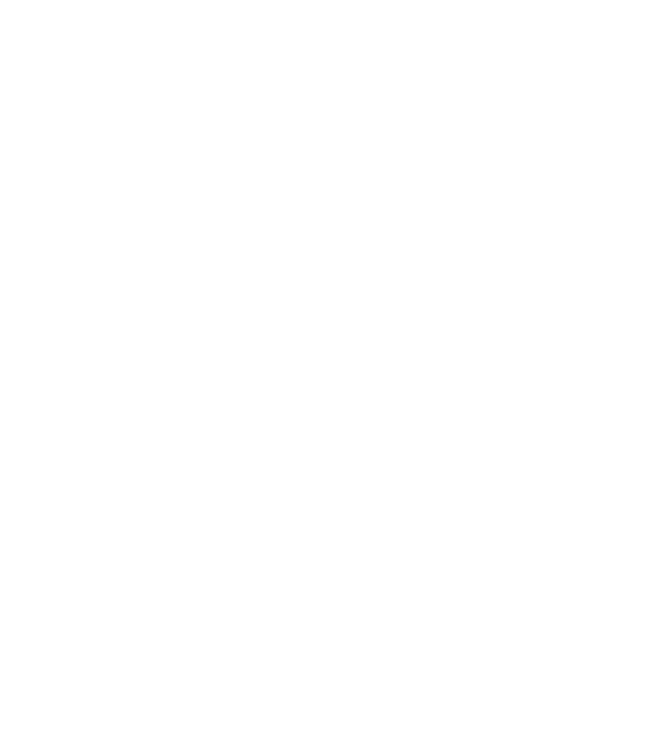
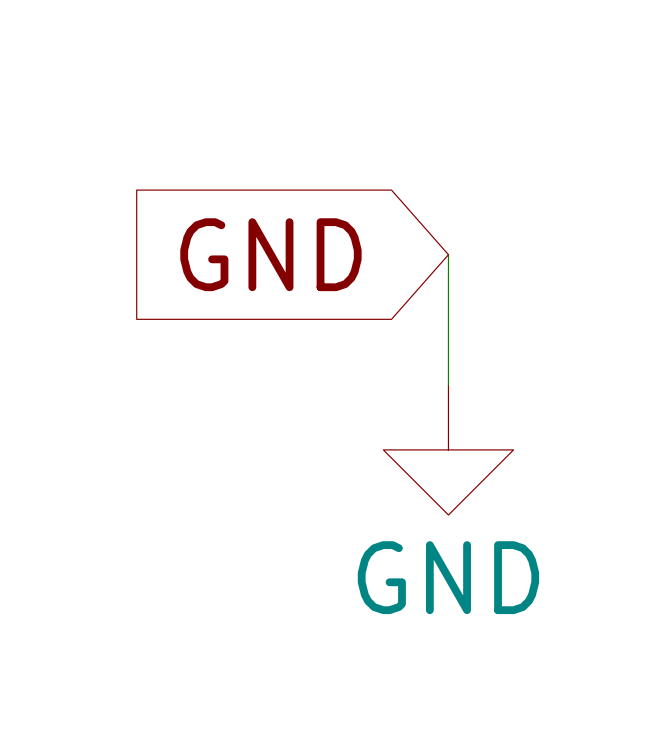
global label: none -> GND (270, 254)
wire: none -> (448, 254) (448, 384)
power symbol: none -> GND (448, 449)

